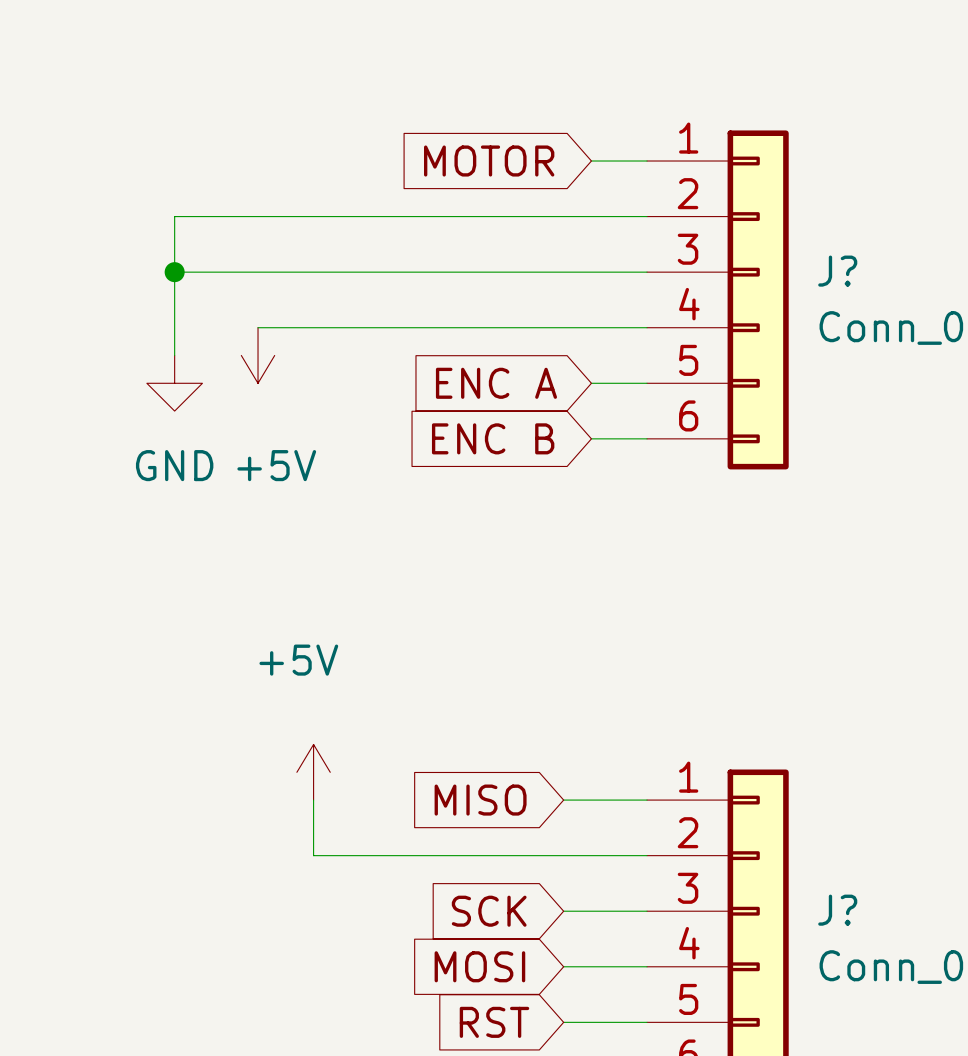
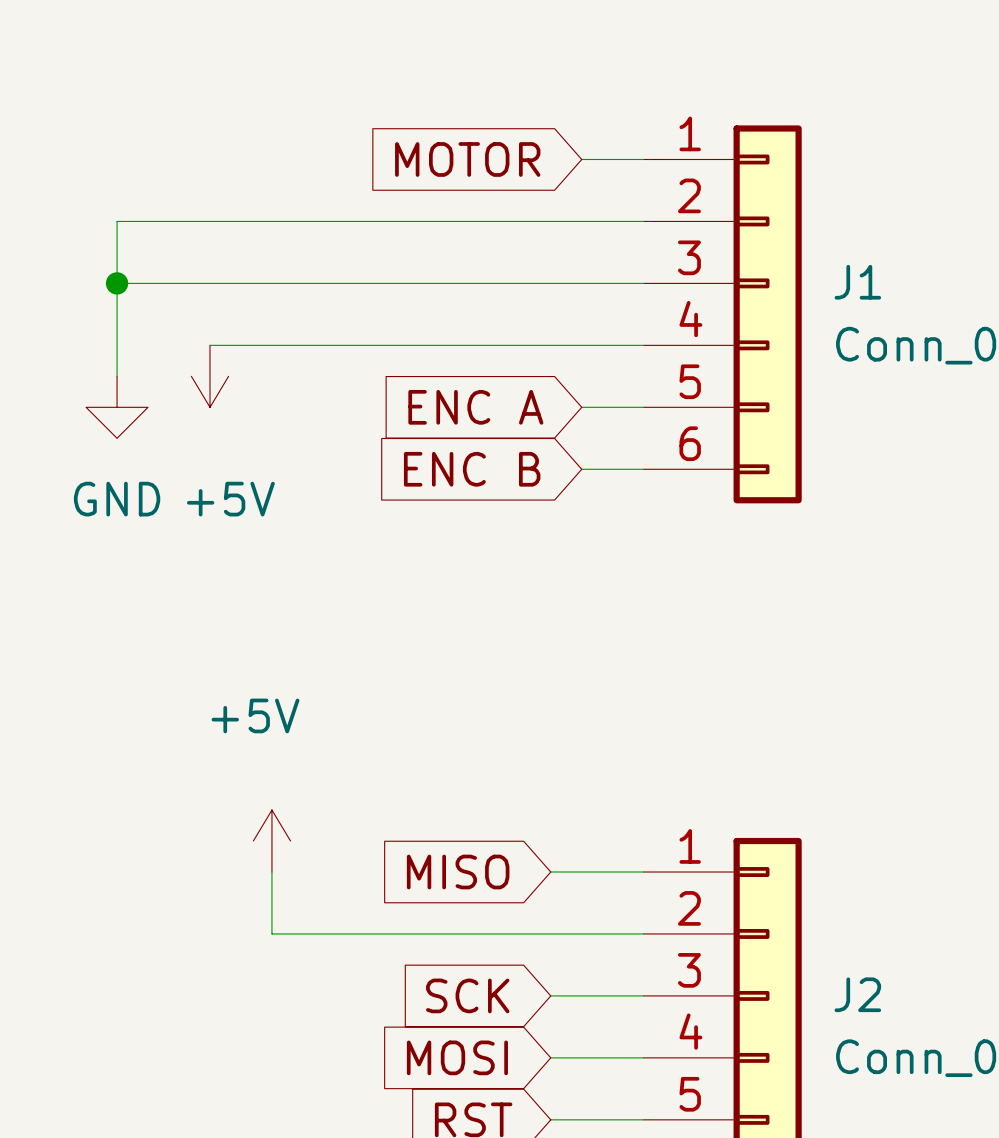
J? name: J? (837, 271) -> J1 (857, 282)
J? name: J? (837, 910) -> J2 (857, 994)

